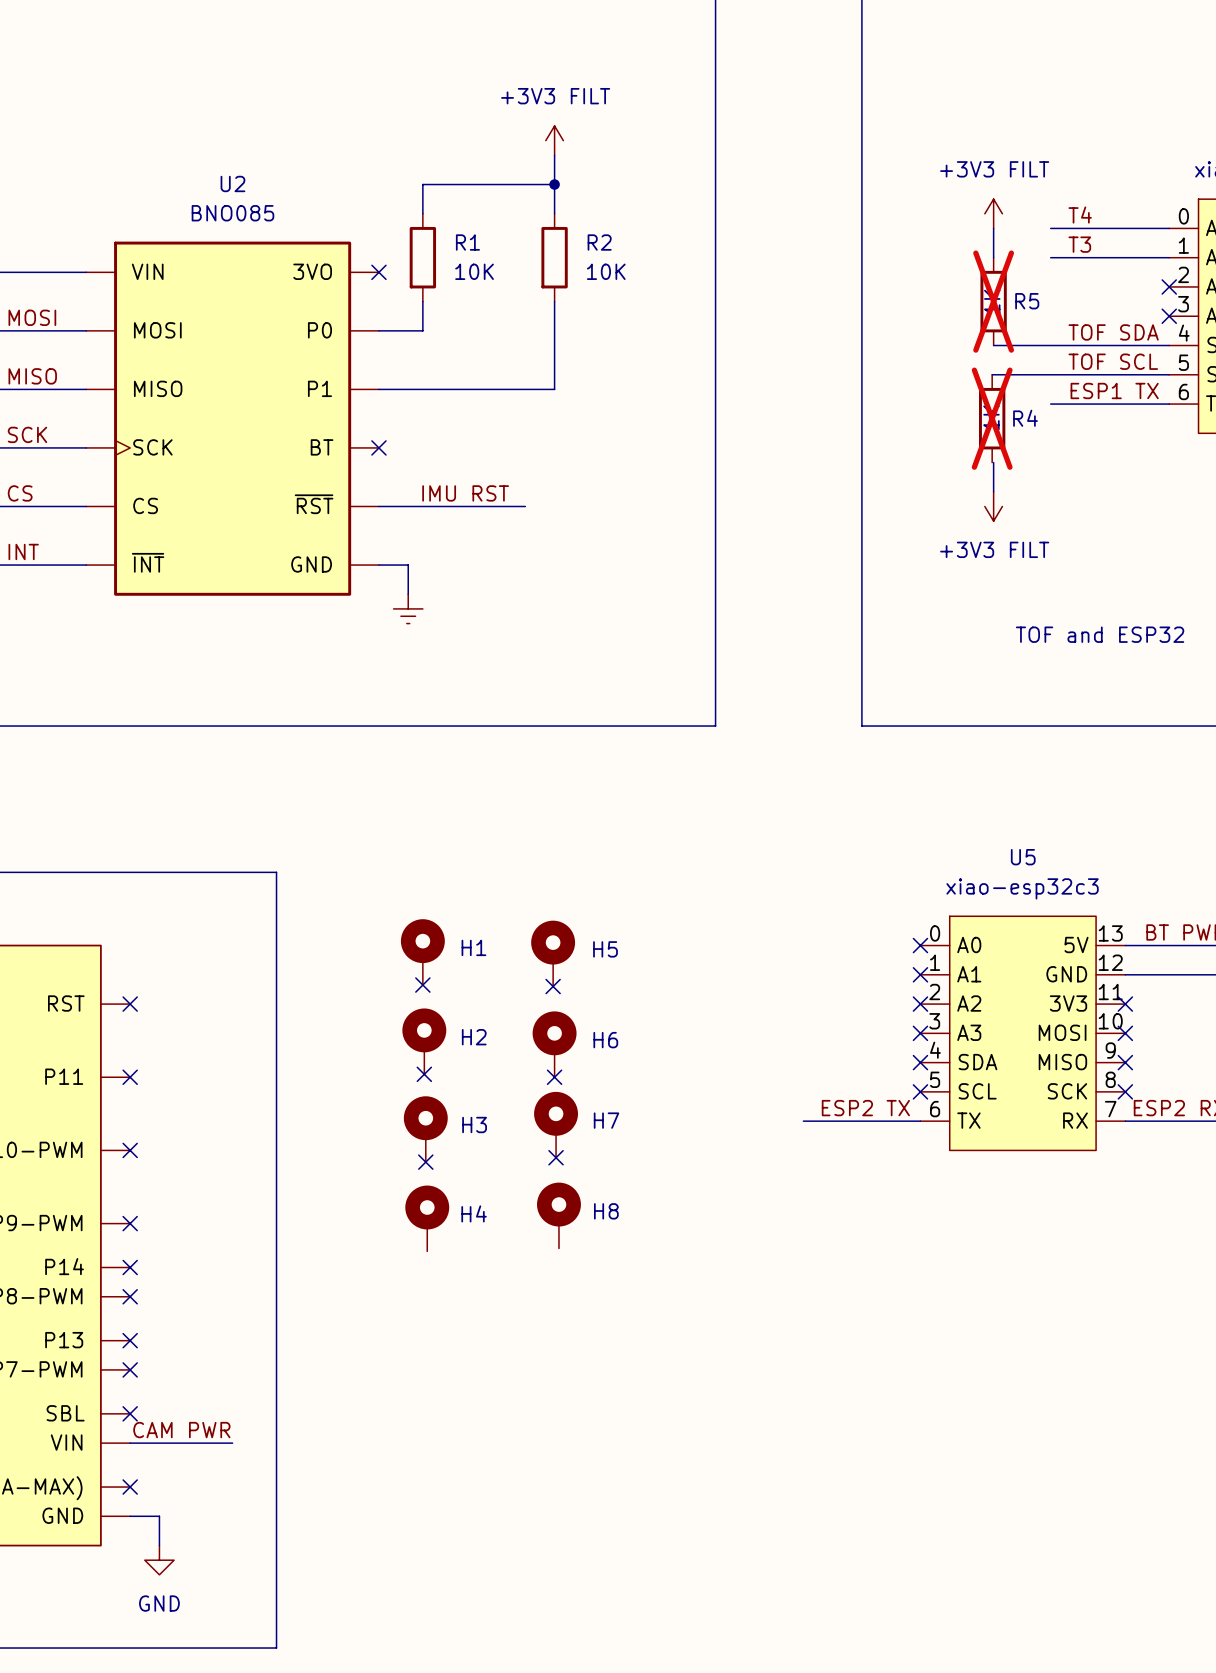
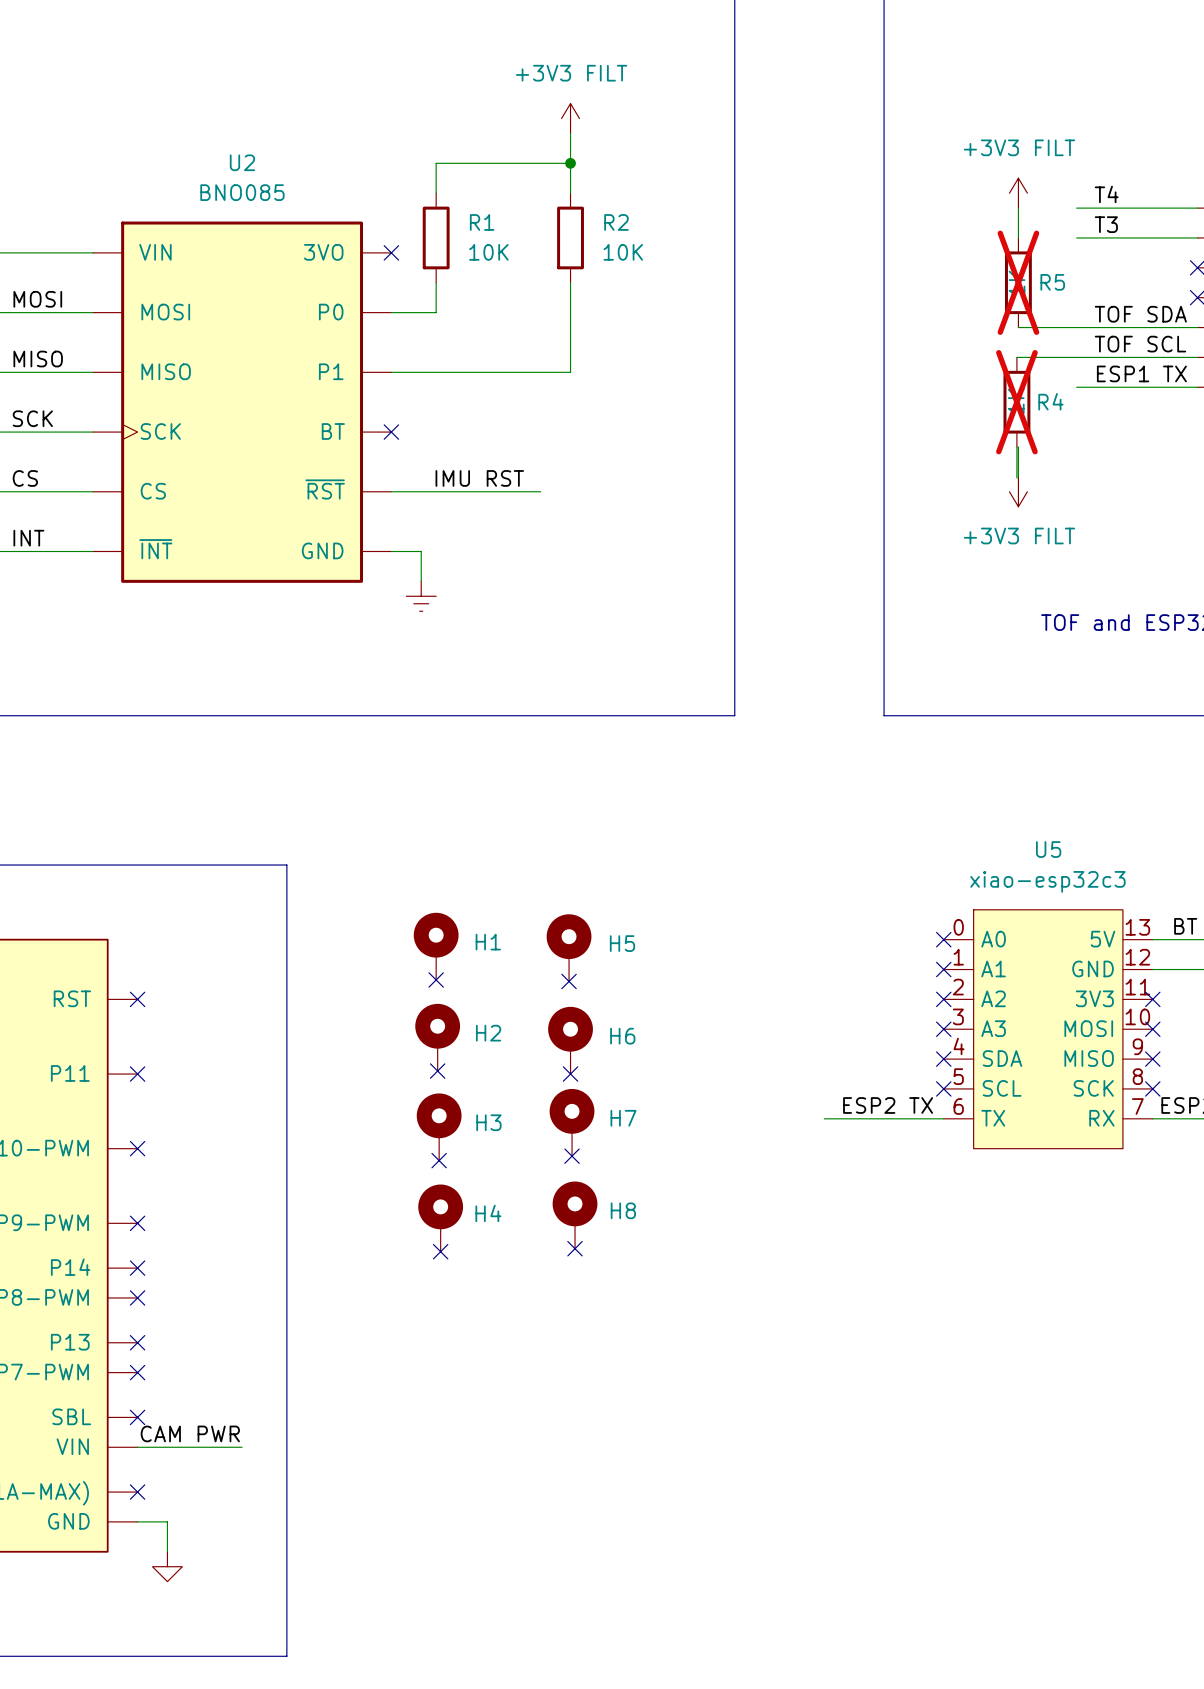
wire: none -> (1016, 446) (1016, 477)
no-connect mark: none -> (575, 1248)
no-connect mark: none -> (440, 1251)
power symbol text: GND (159, 1603) -> none

